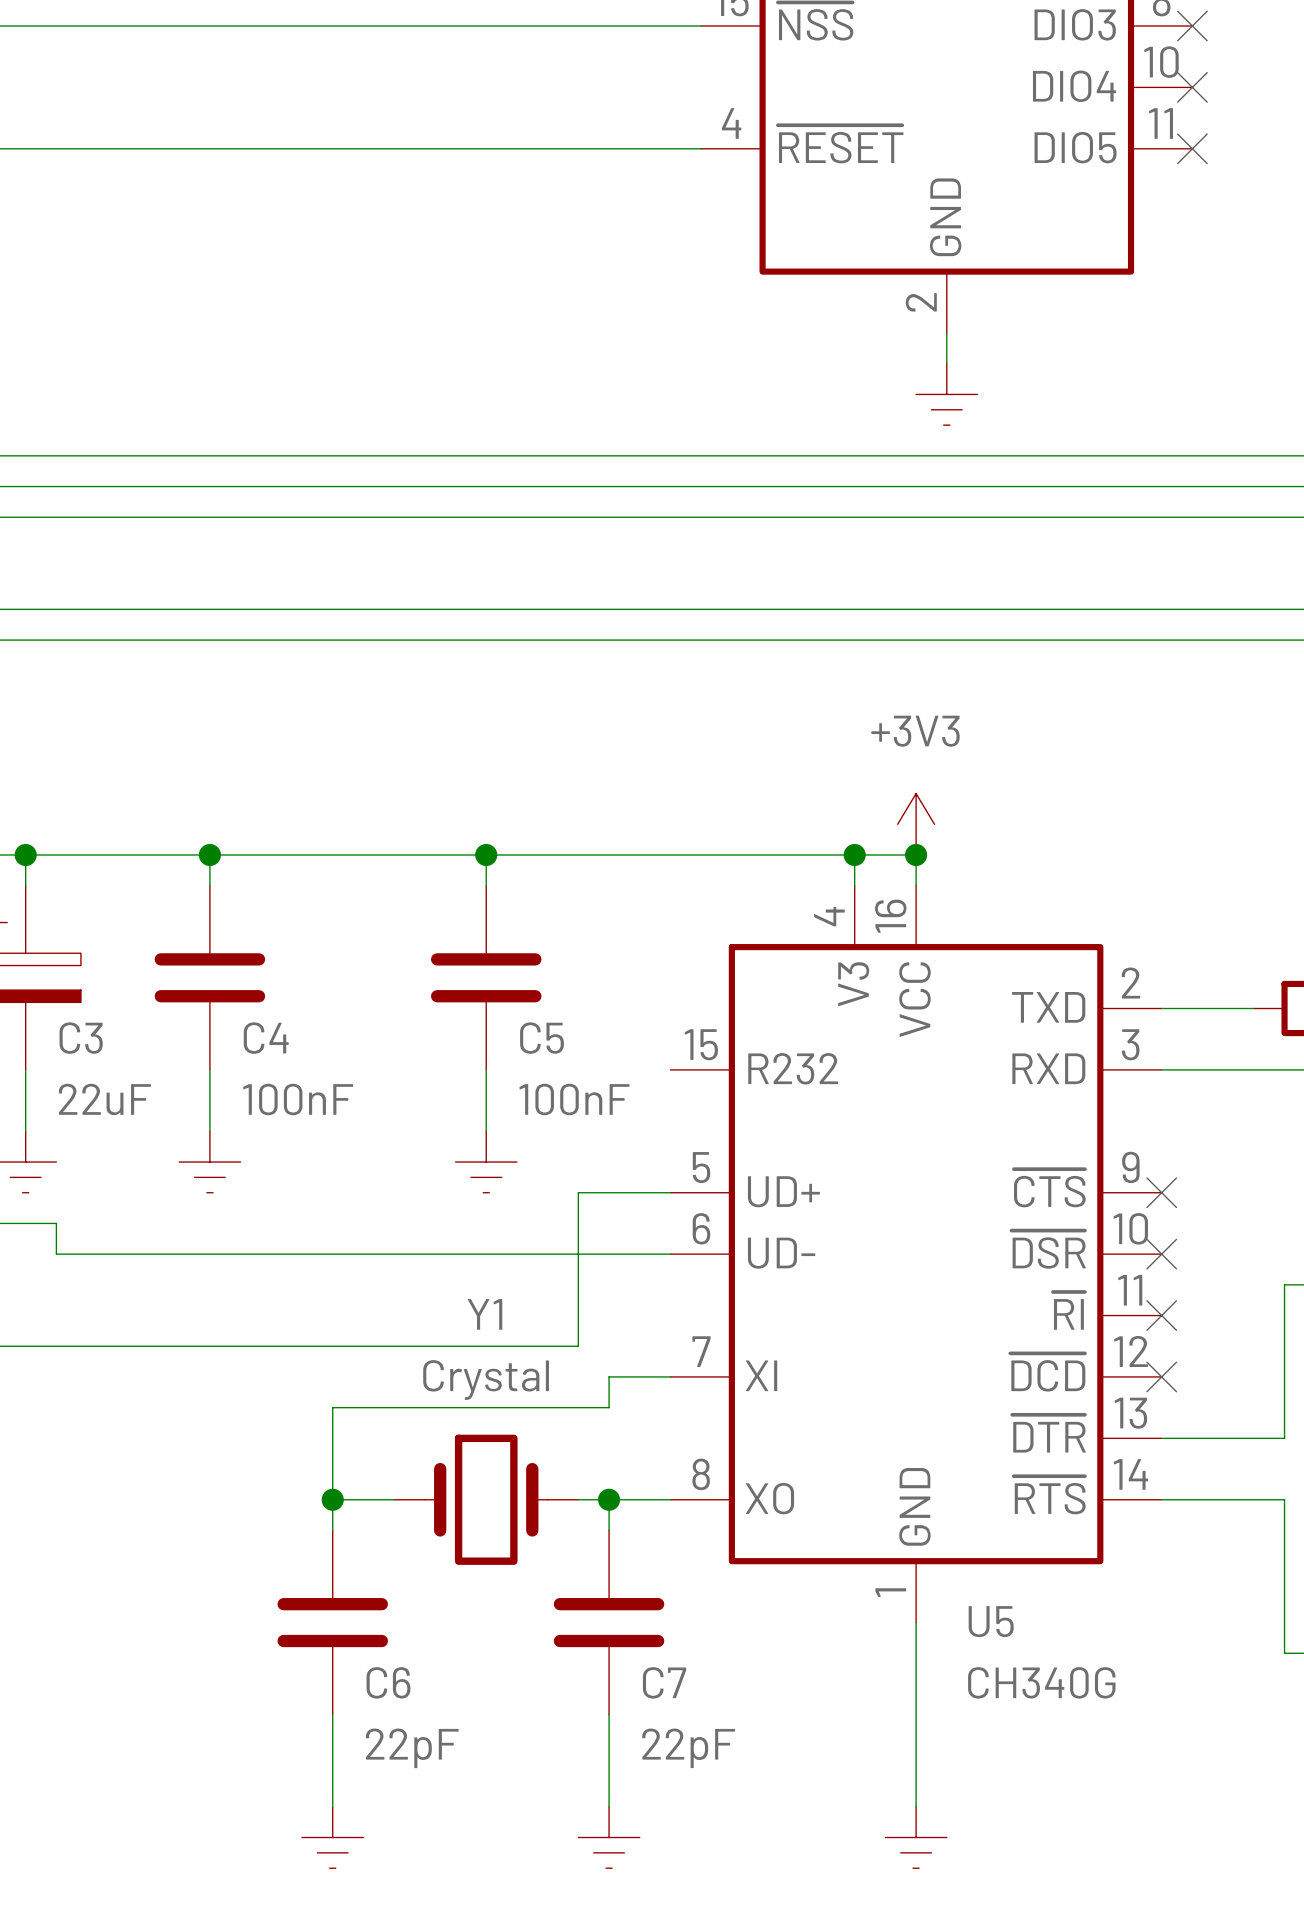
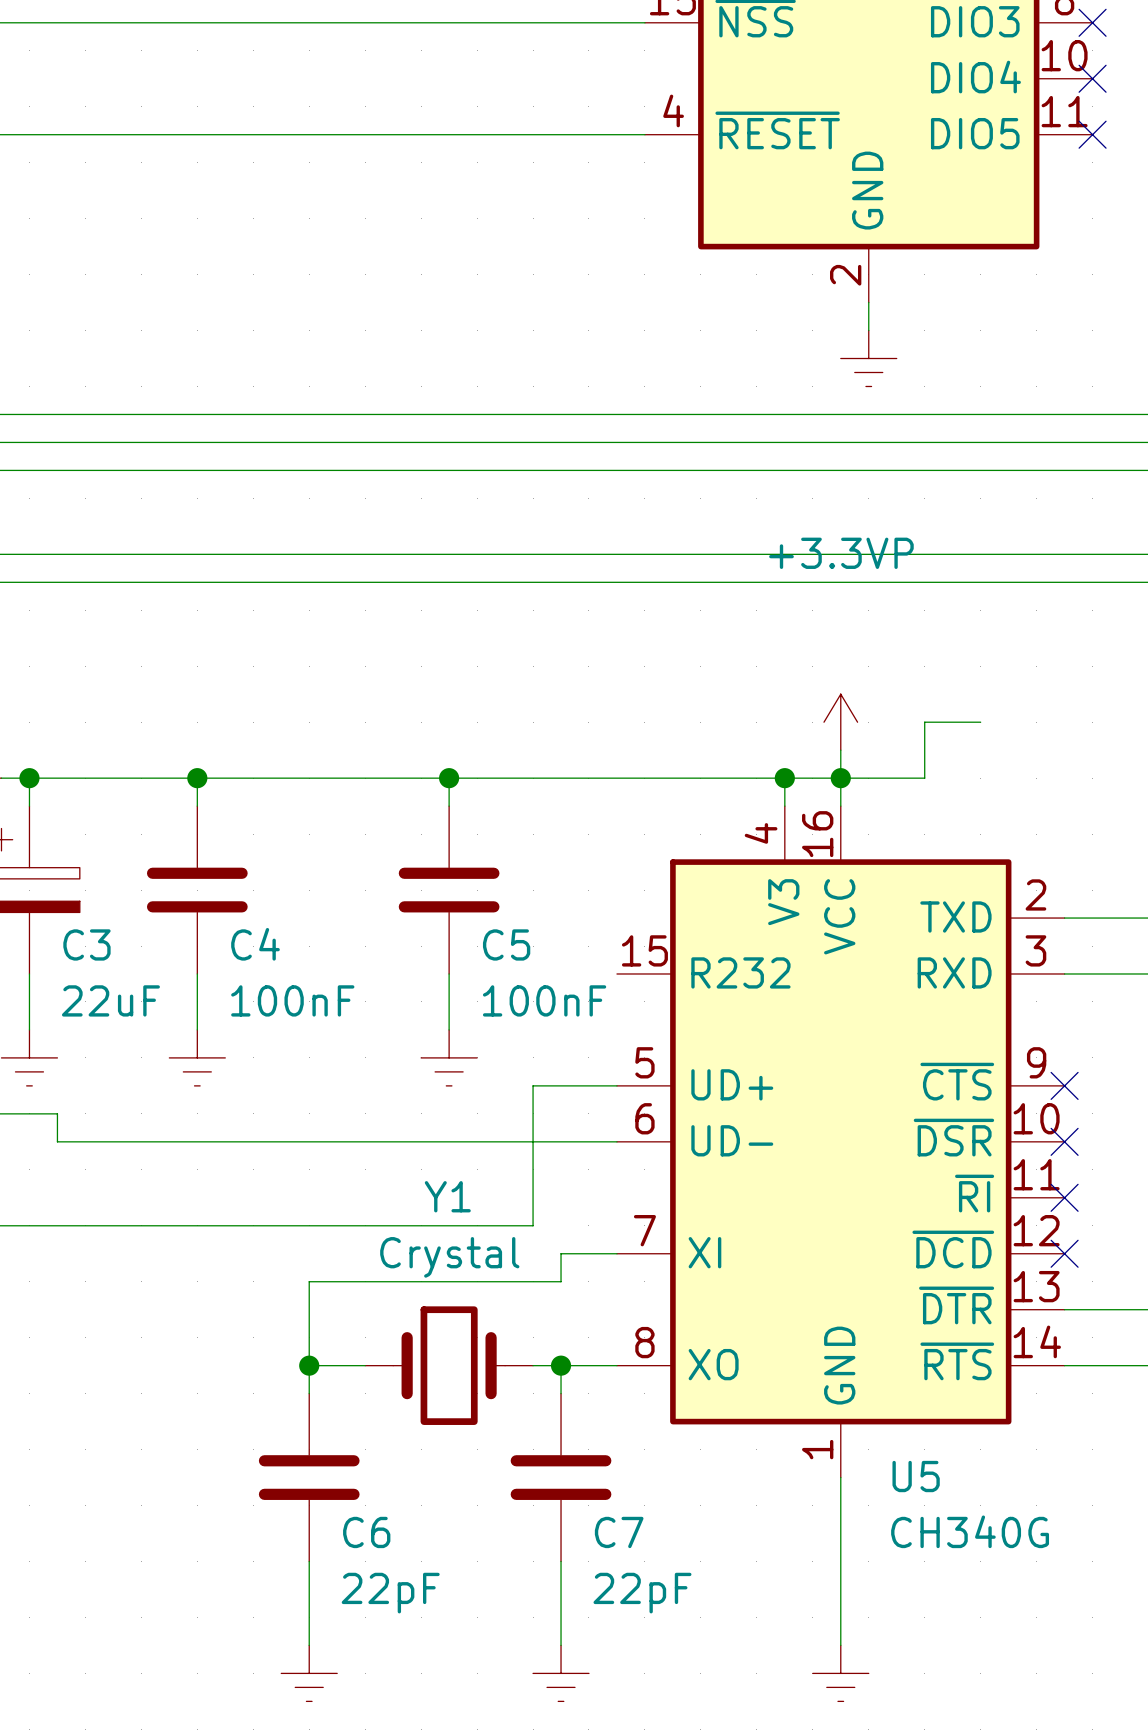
power symbol: none -> +3.3VP (840, 722)
wire: none -> (980, 722) (924, 722) (924, 778) (840, 778) (840, 750)
power symbol: +3V3 (916, 824) -> none

